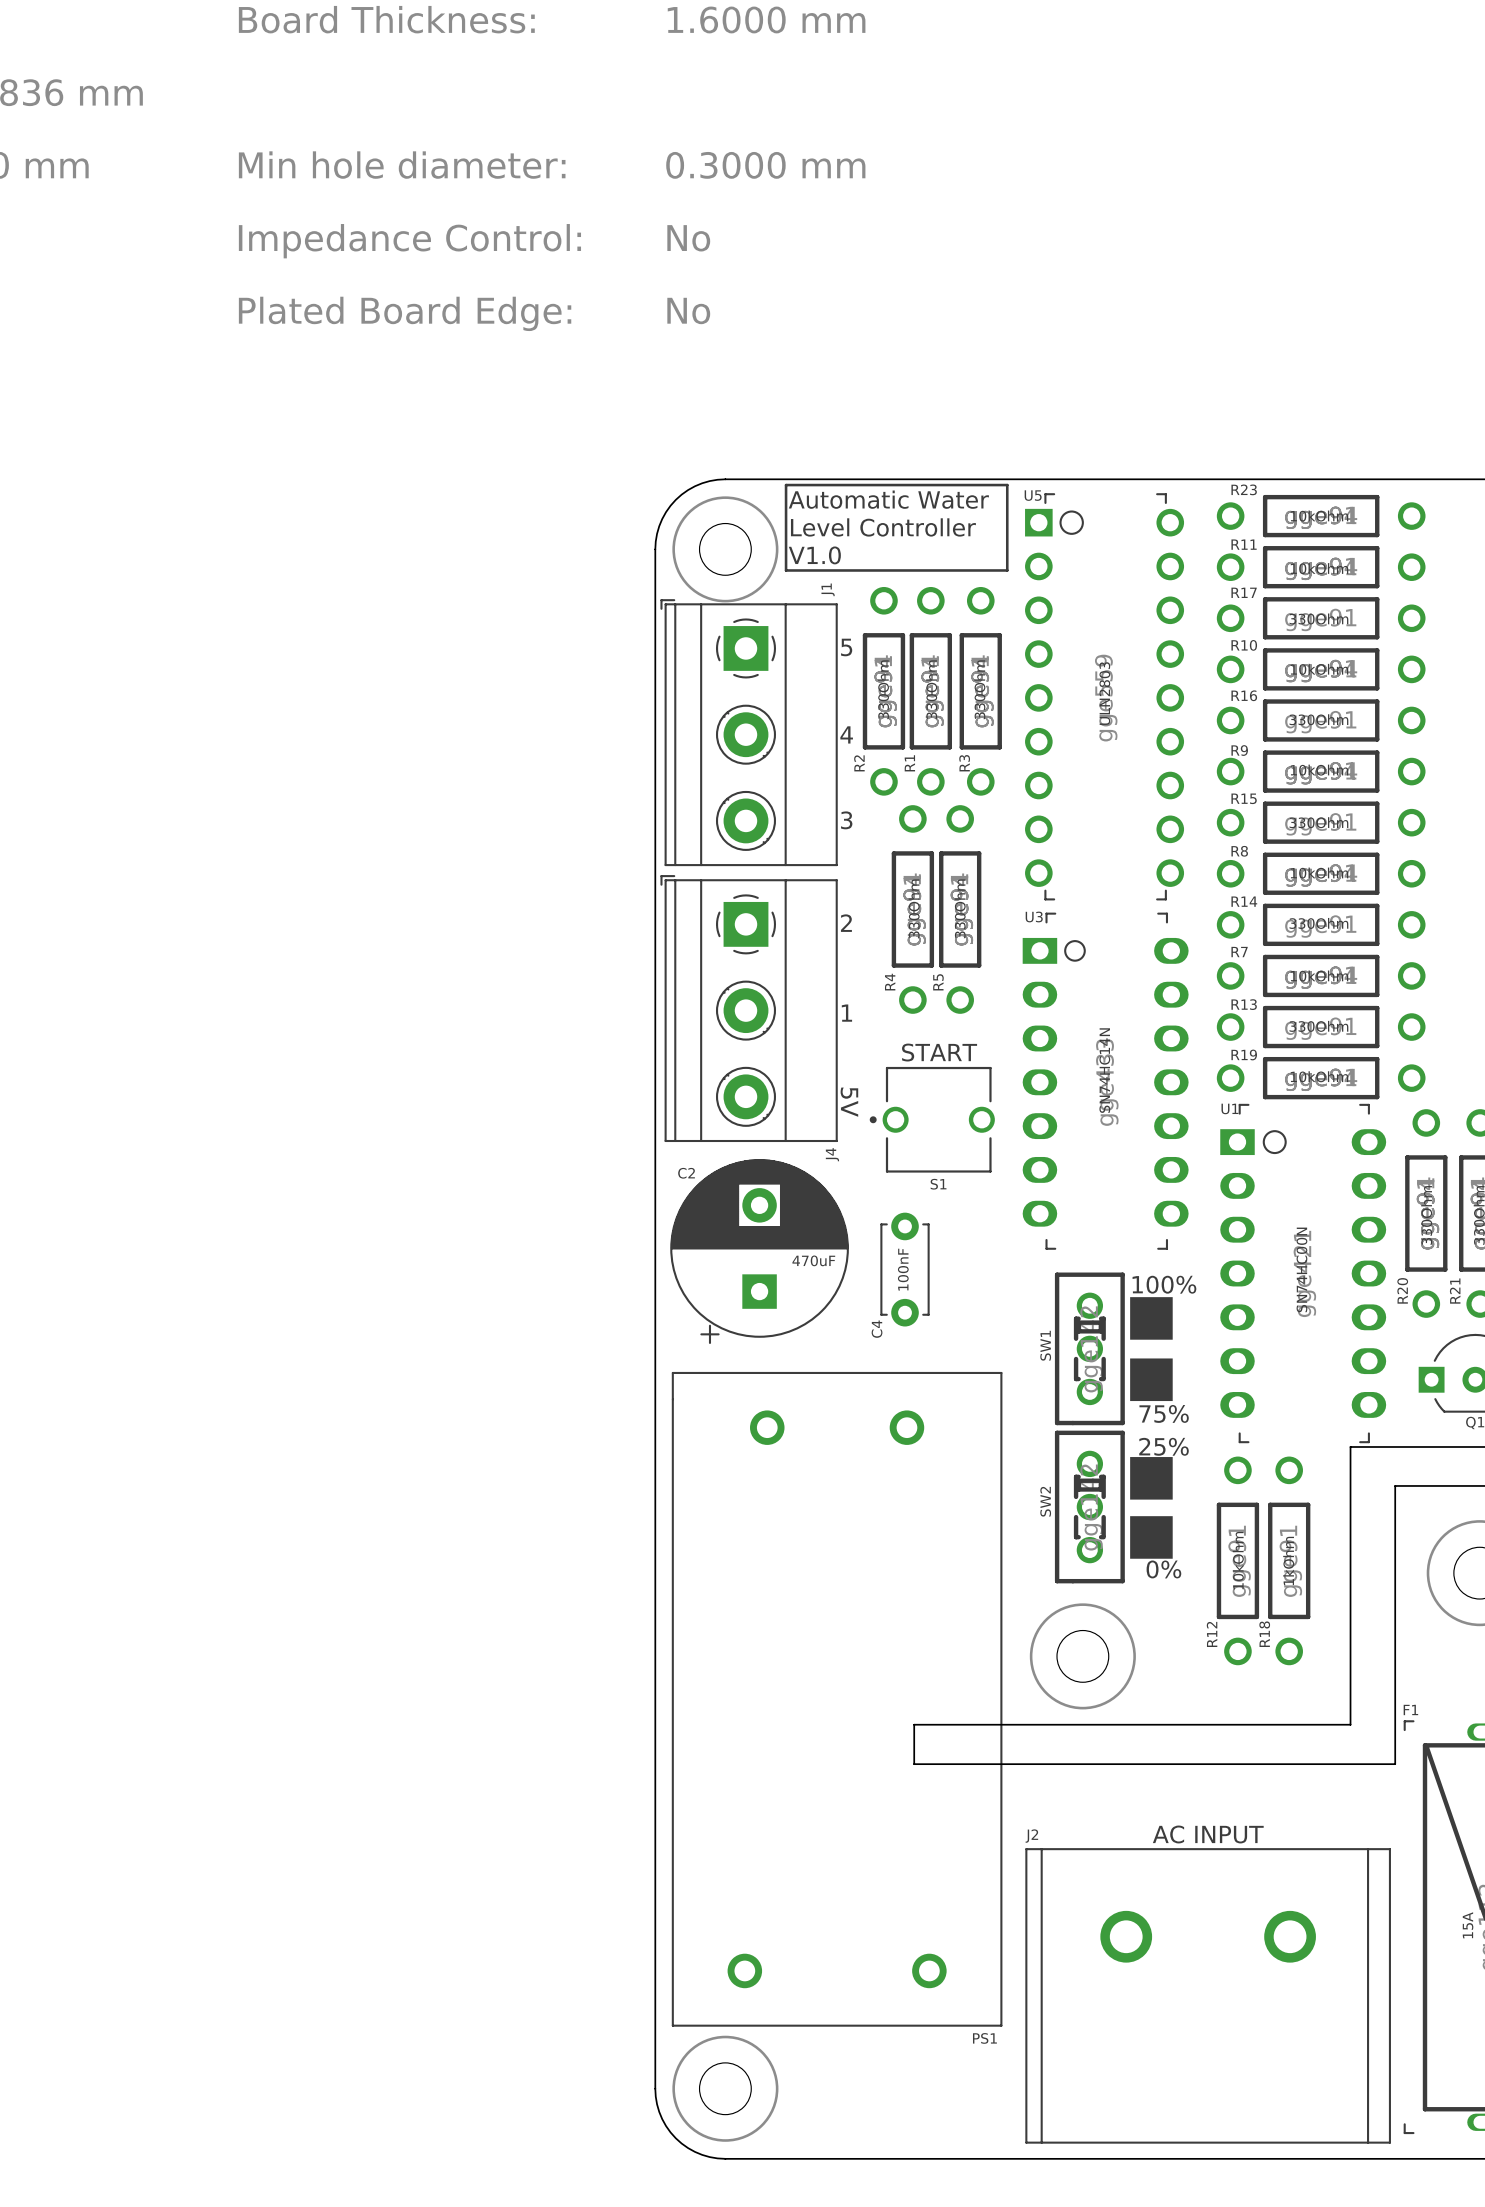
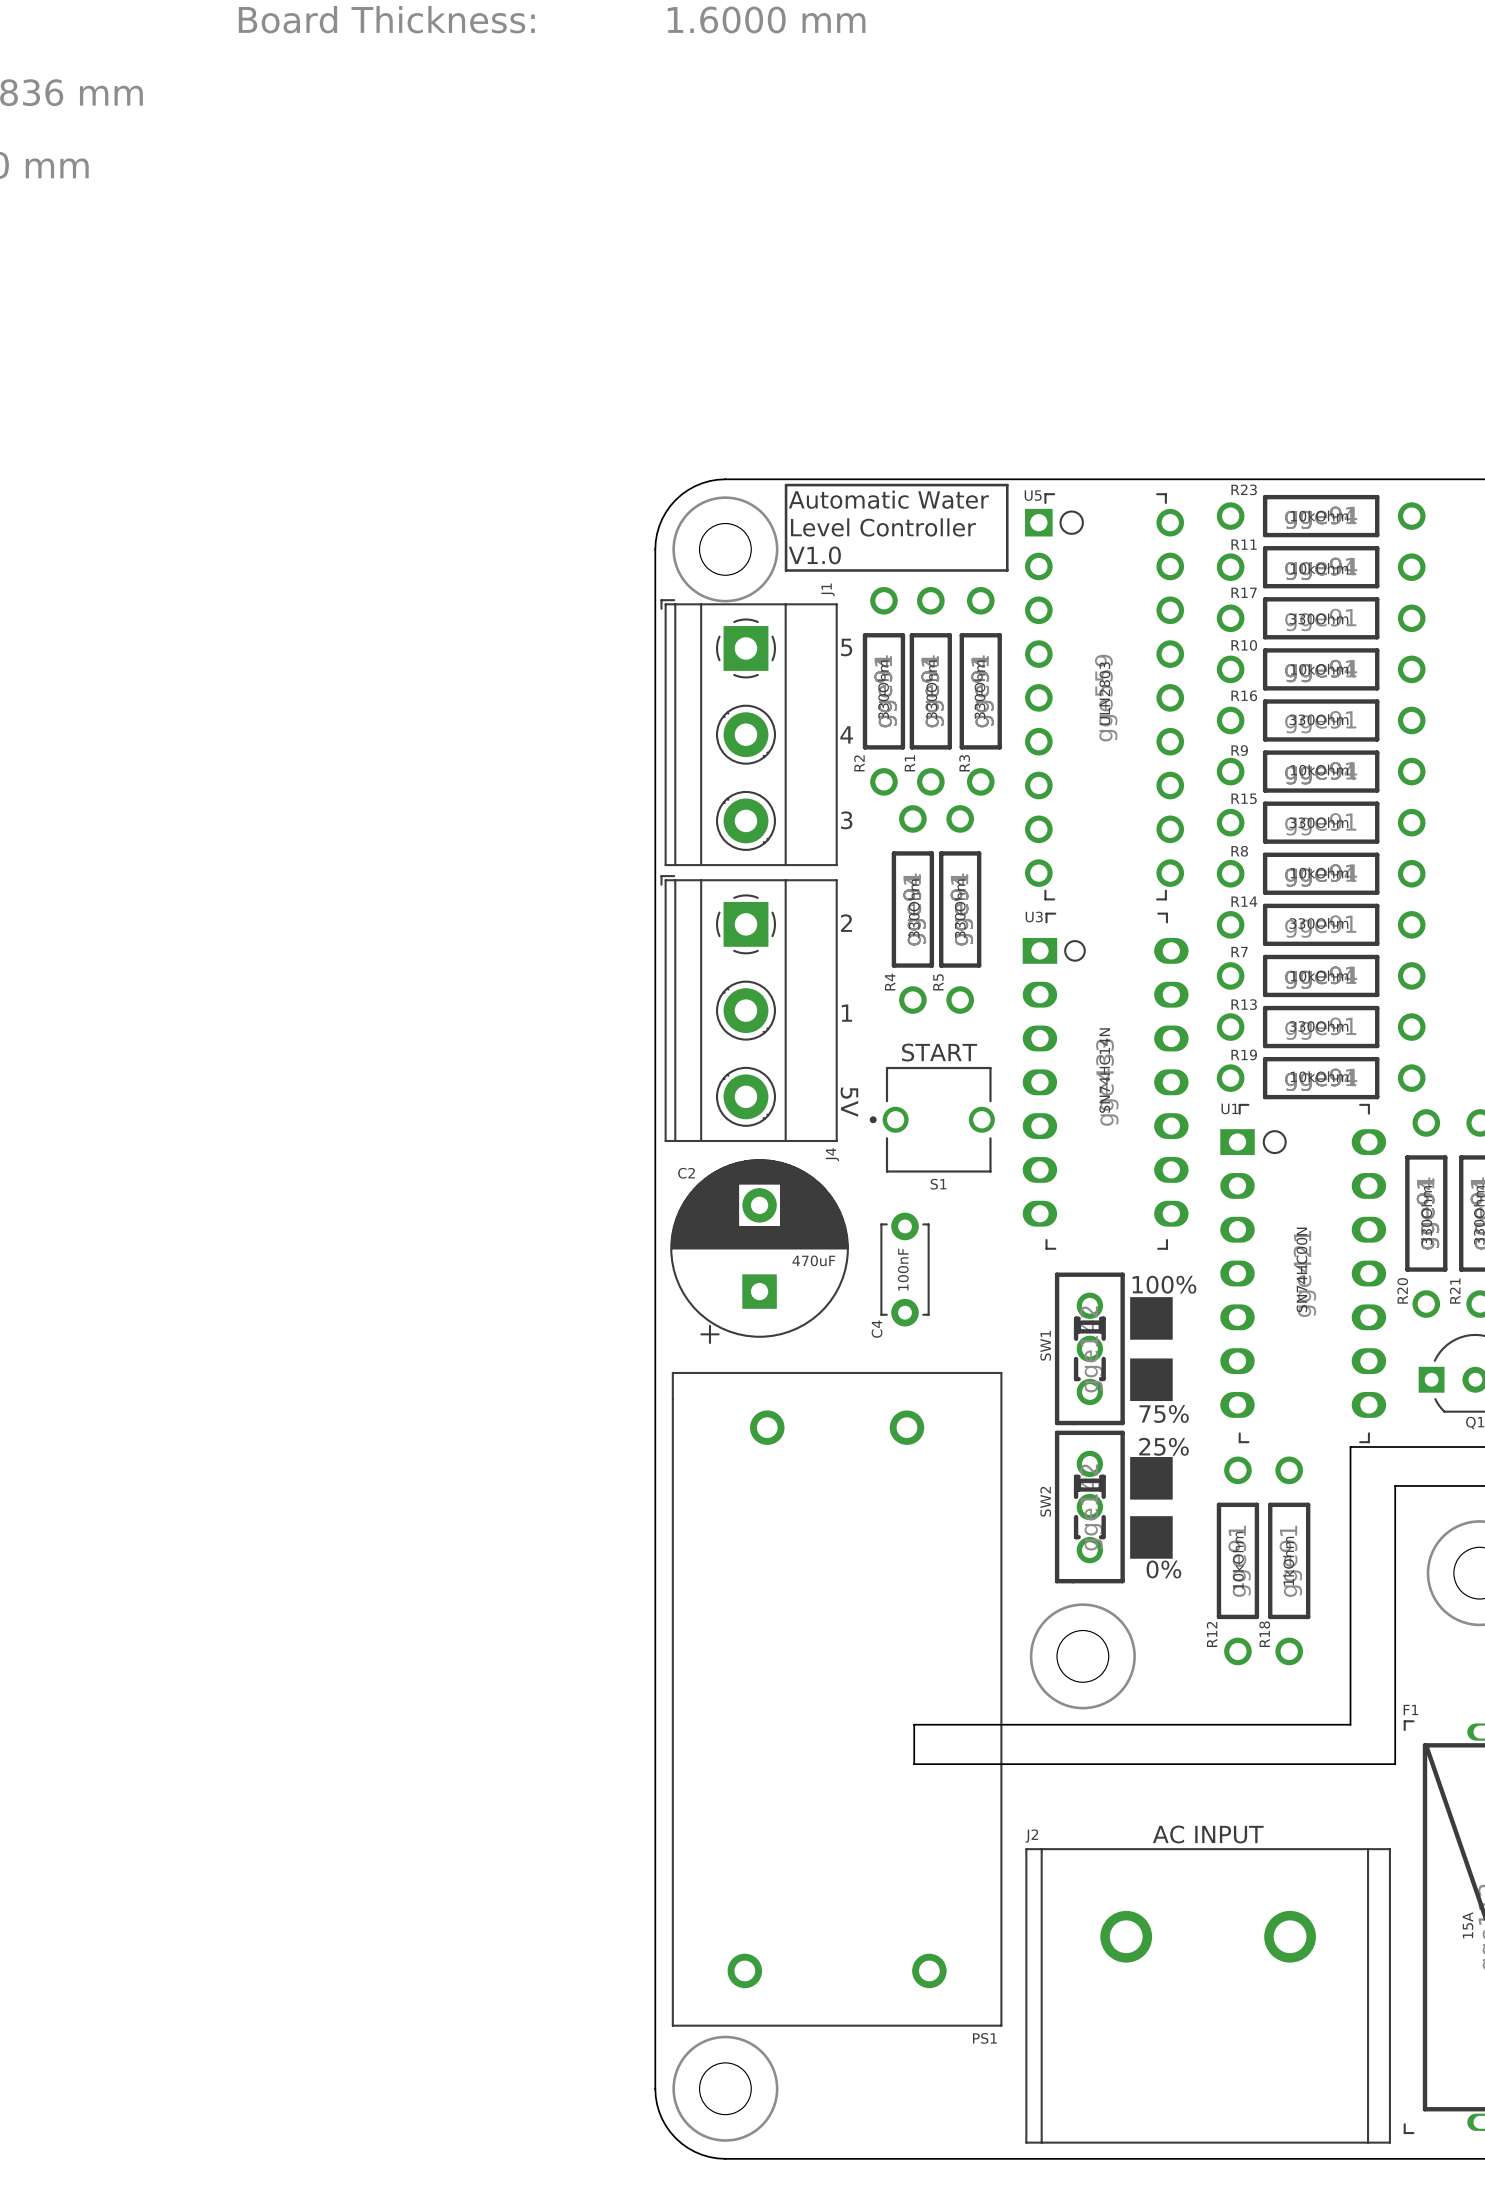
text: Min hole diameter: (402, 165) -> none
text: 0.3000 mm (765, 165) -> none
text: No (688, 238) -> none
text: Impedance Control: (409, 241) -> none
text: No (688, 310) -> none
text: Plated Board Edge: (405, 313) -> none

